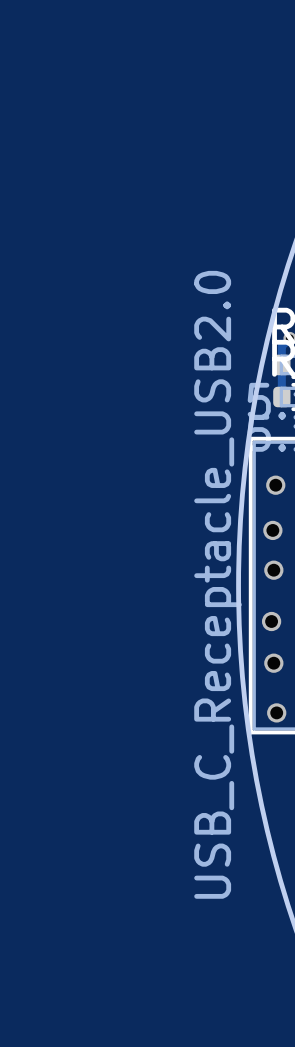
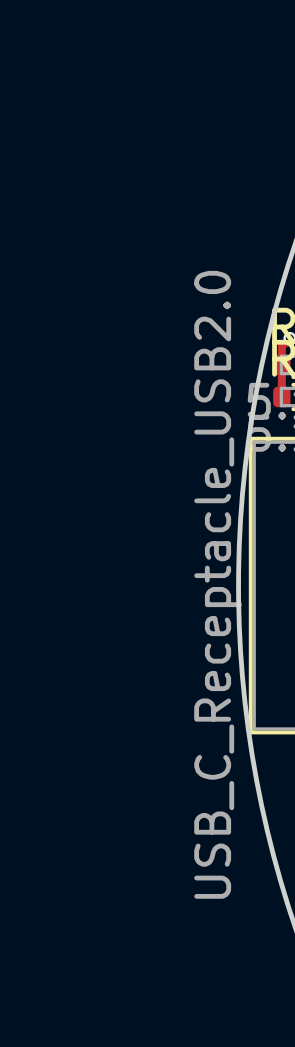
via: (275, 485) -> none
via: (272, 530) -> none
via: (273, 570) -> none
via: (271, 621) -> none
via: (273, 663) -> none
via: (276, 712) -> none

